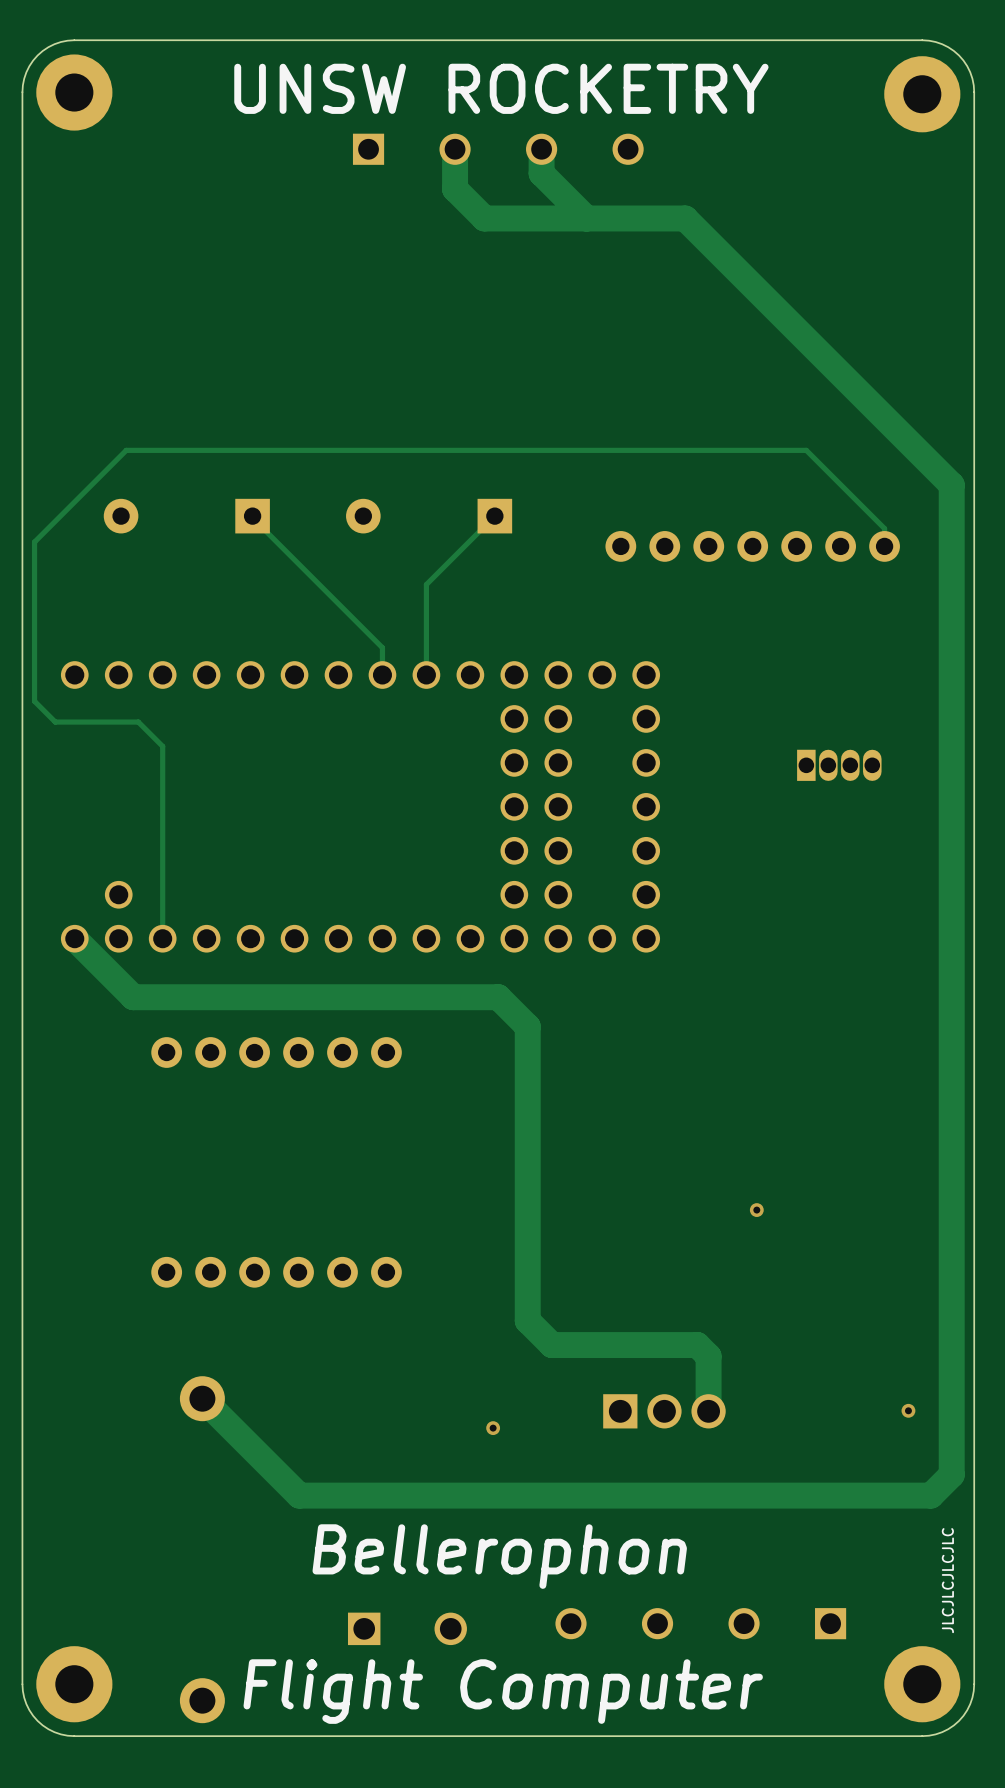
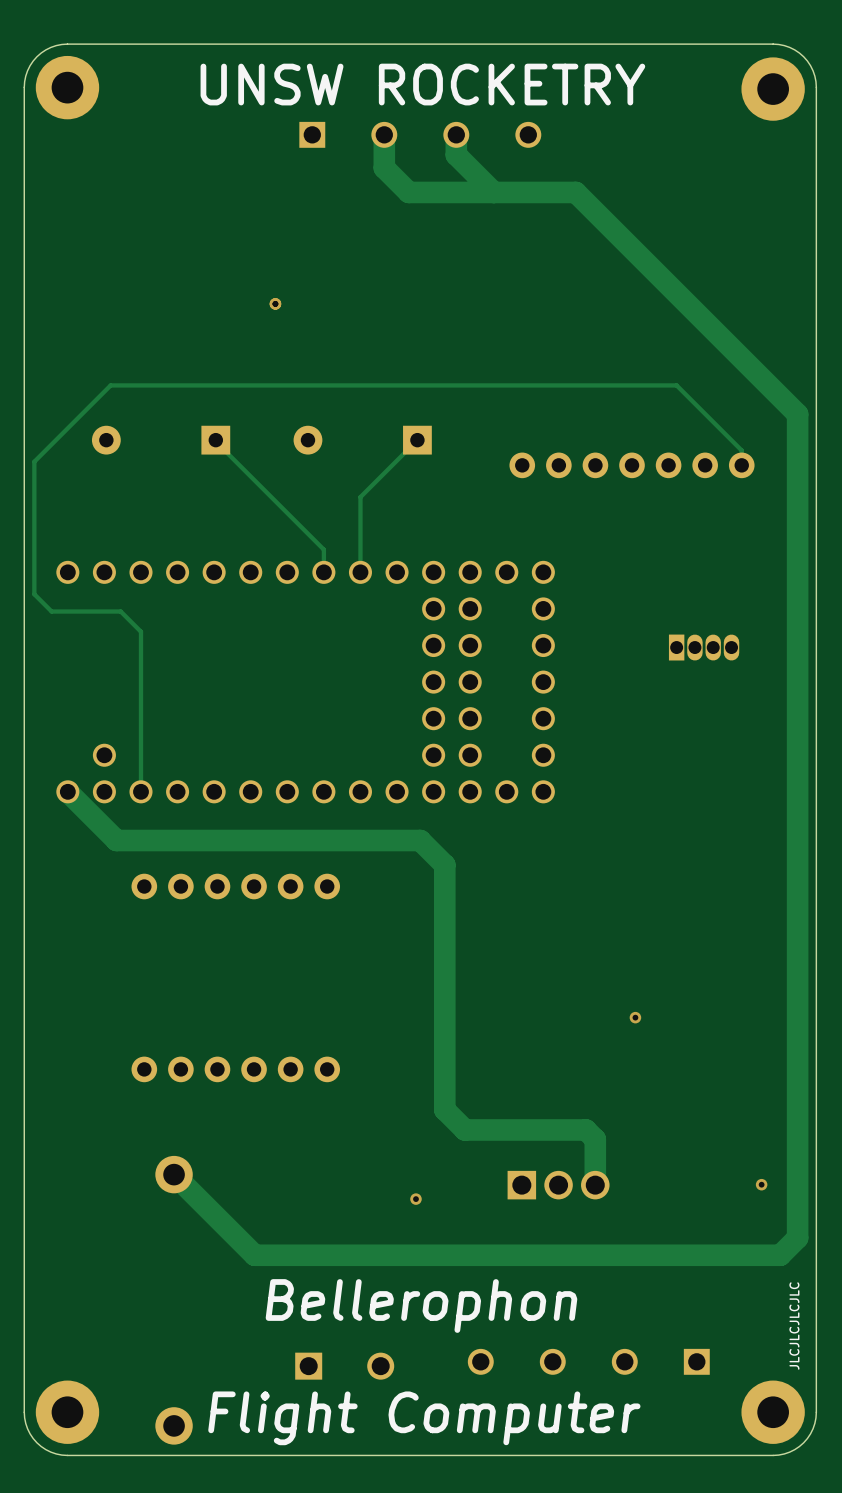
via: none -> (275, 303)

